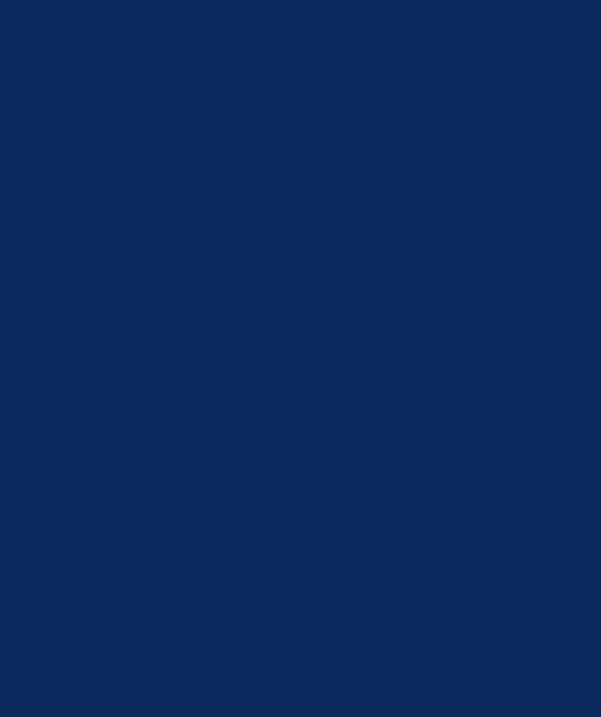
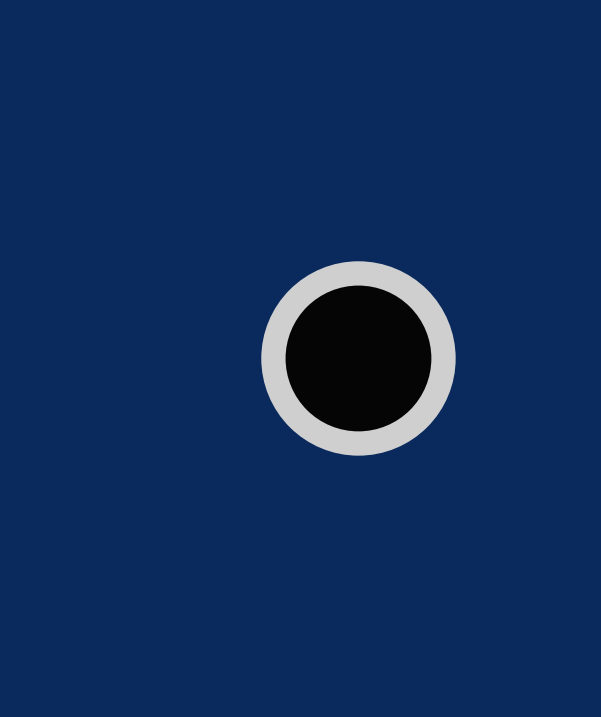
part: none -> (358, 358)

